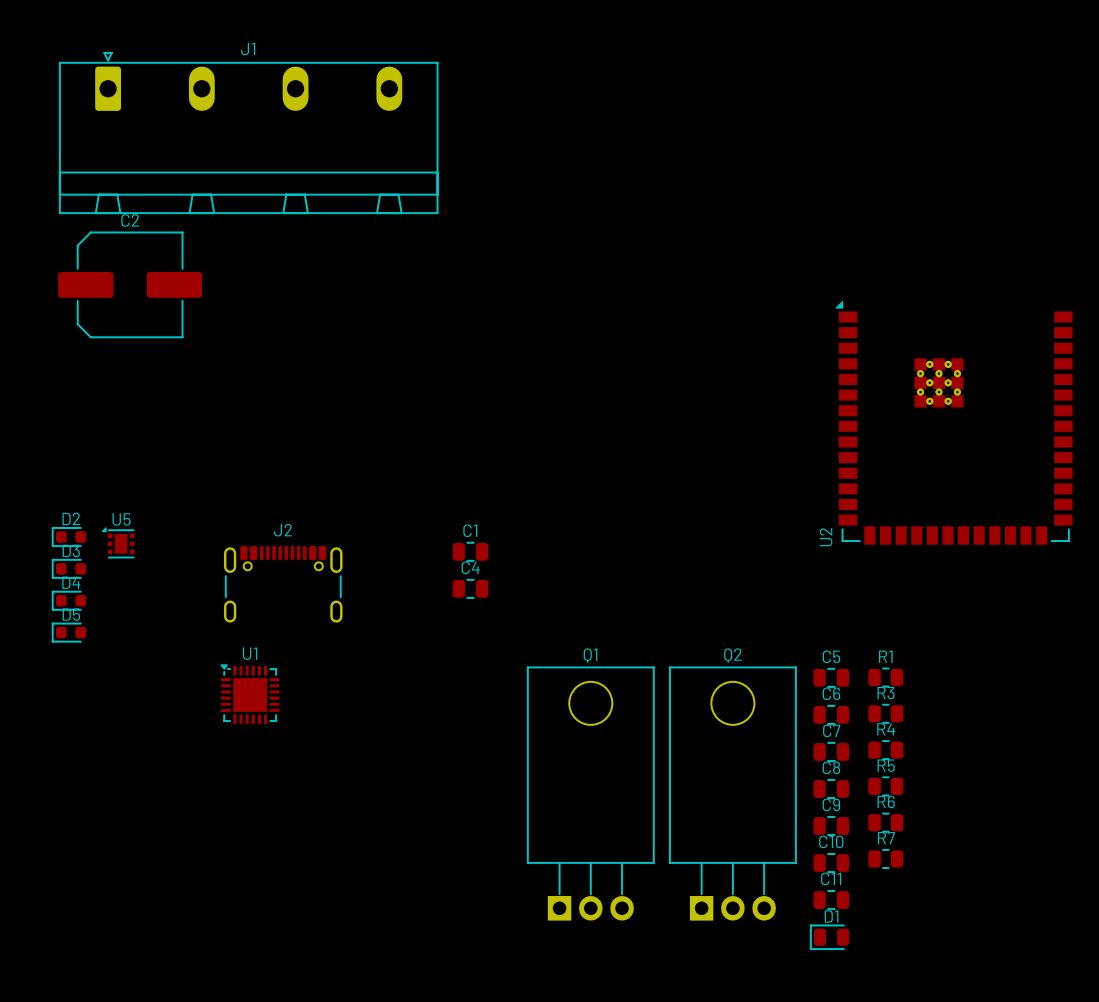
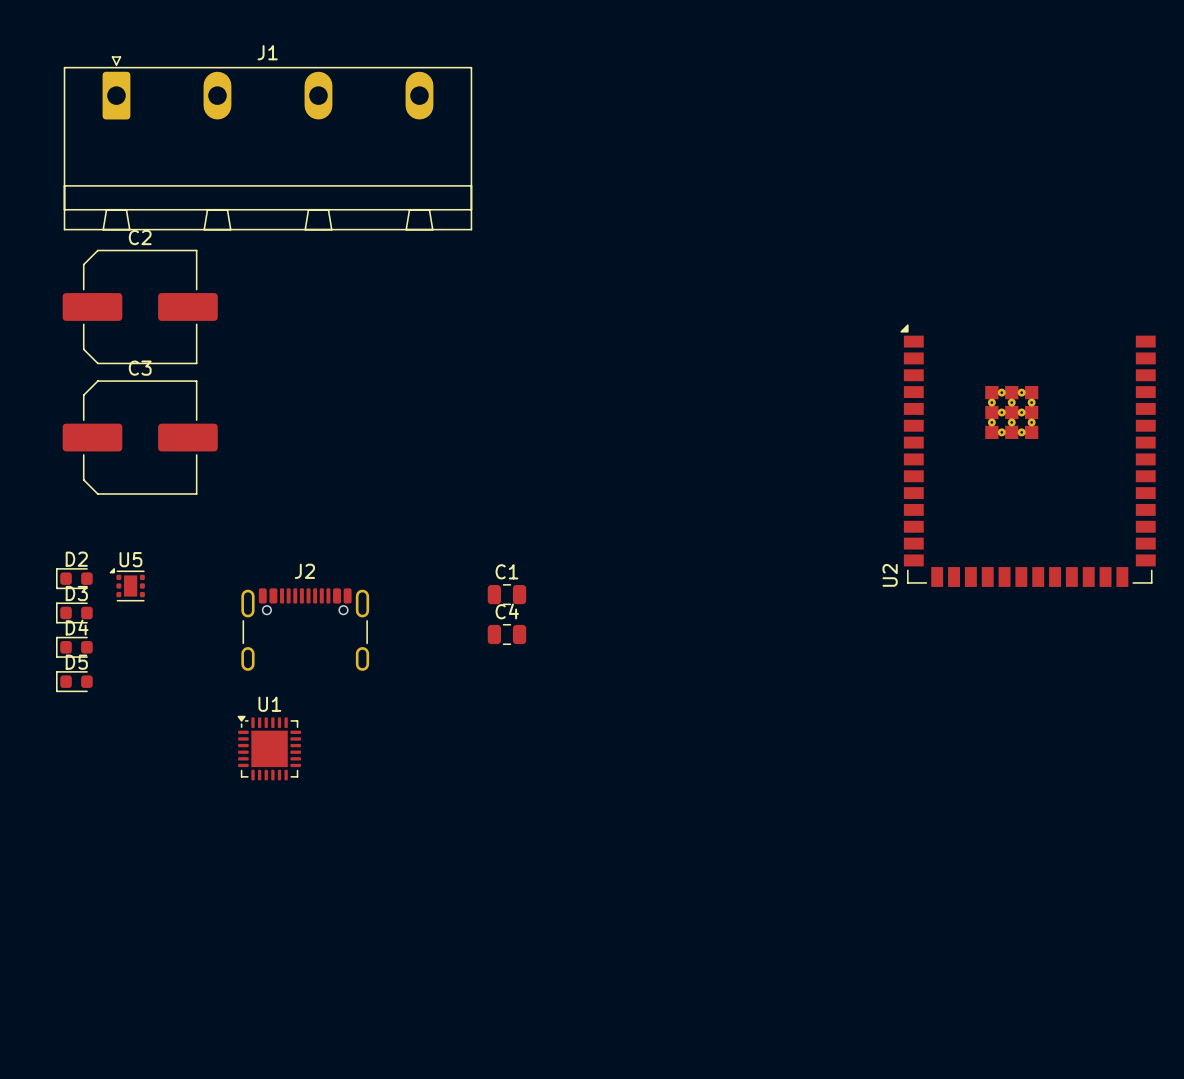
C3: none -> (140, 437)
C5: (831, 677) -> none
R1: (885, 677) -> none
R3: (885, 713) -> none
C6: (831, 714) -> none
R4: (885, 750) -> none
C7: (831, 751) -> none
R5: (885, 786) -> none
C8: (831, 788) -> none
Q1: (590, 793) -> none
Q2: (732, 793) -> none
R6: (885, 822) -> none
C9: (831, 825) -> none
R7: (885, 858) -> none
C10: (831, 863) -> none
C11: (831, 900) -> none
D1: (829, 937) -> none

